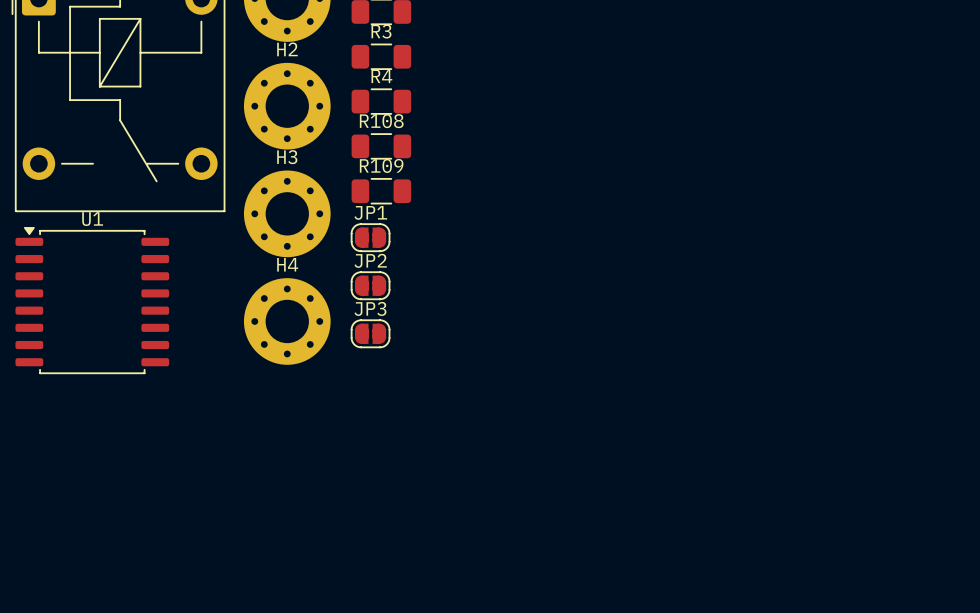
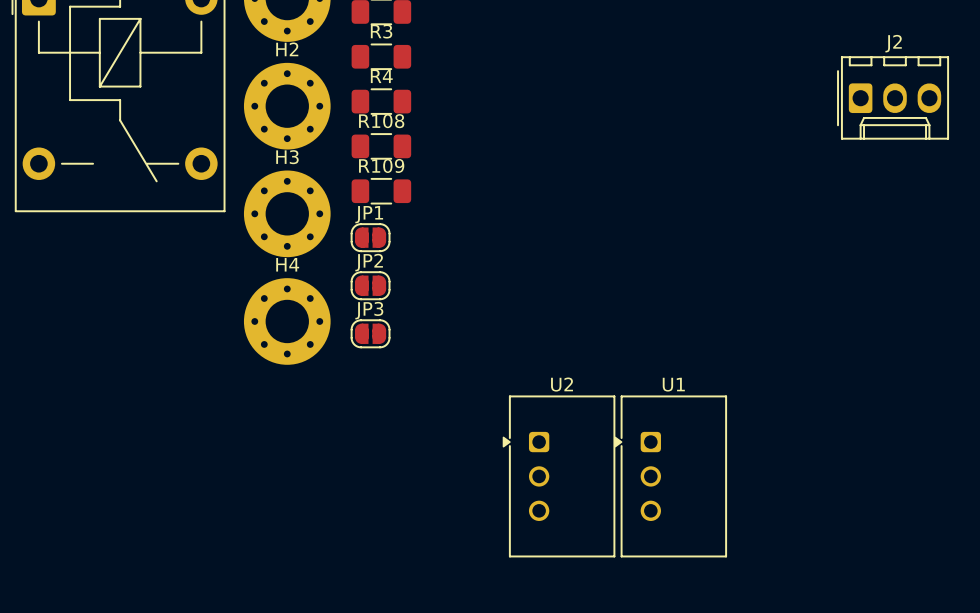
J2: none -> (893, 97)
U1 footprint: [15, 227, 170, 375] -> [614, 395, 727, 558]
U2: none -> (558, 476)

